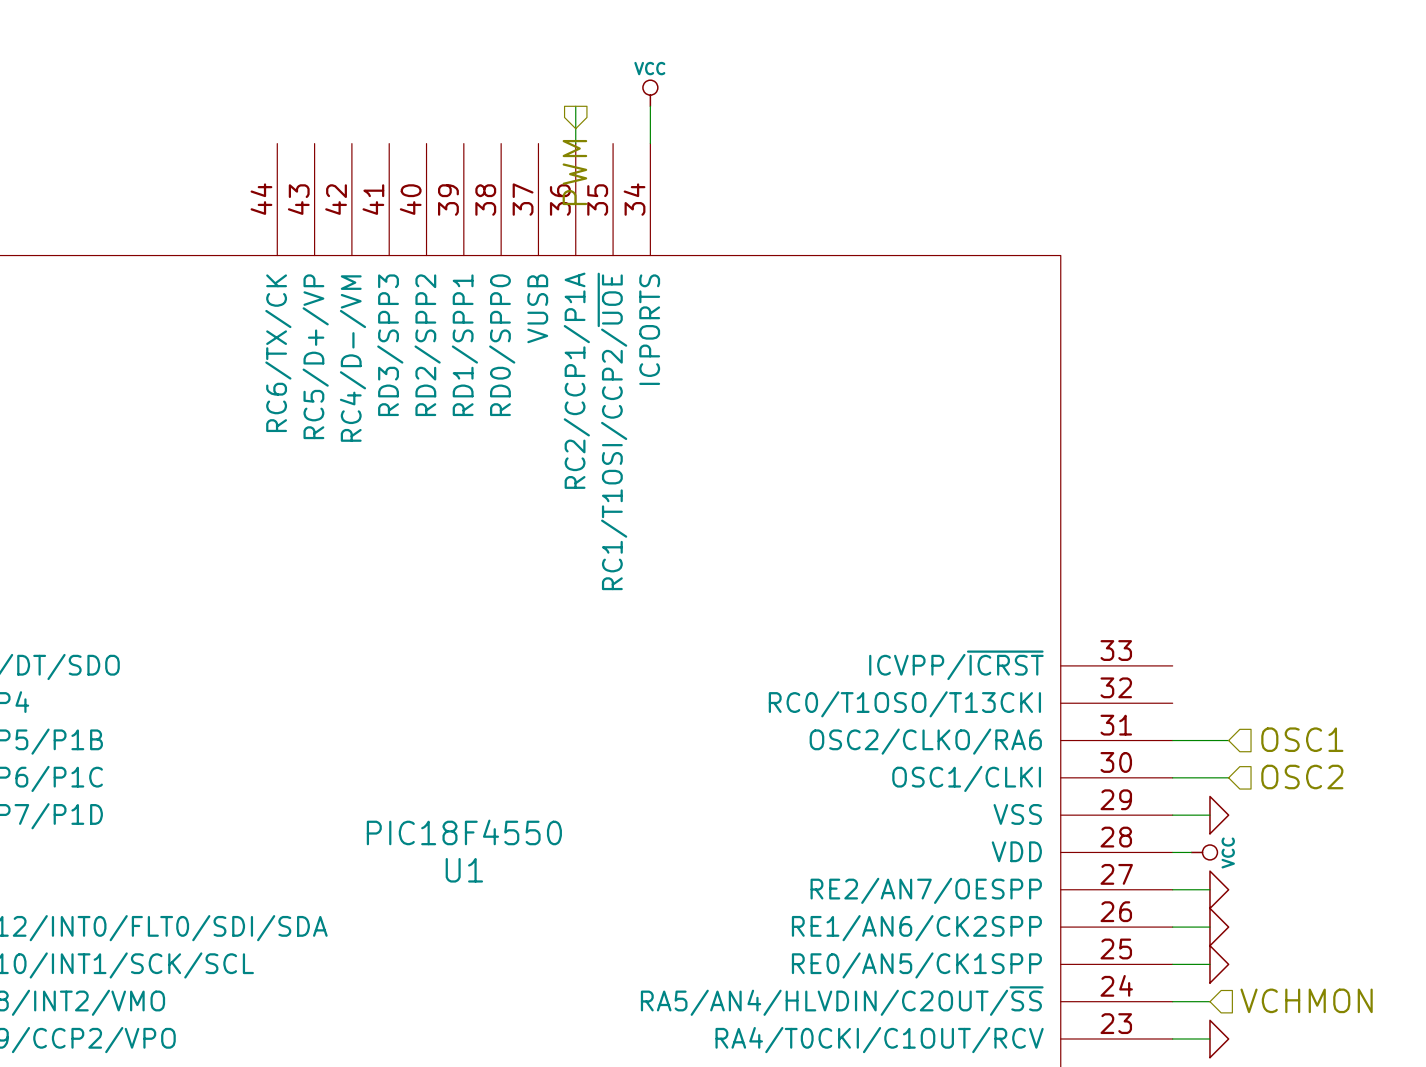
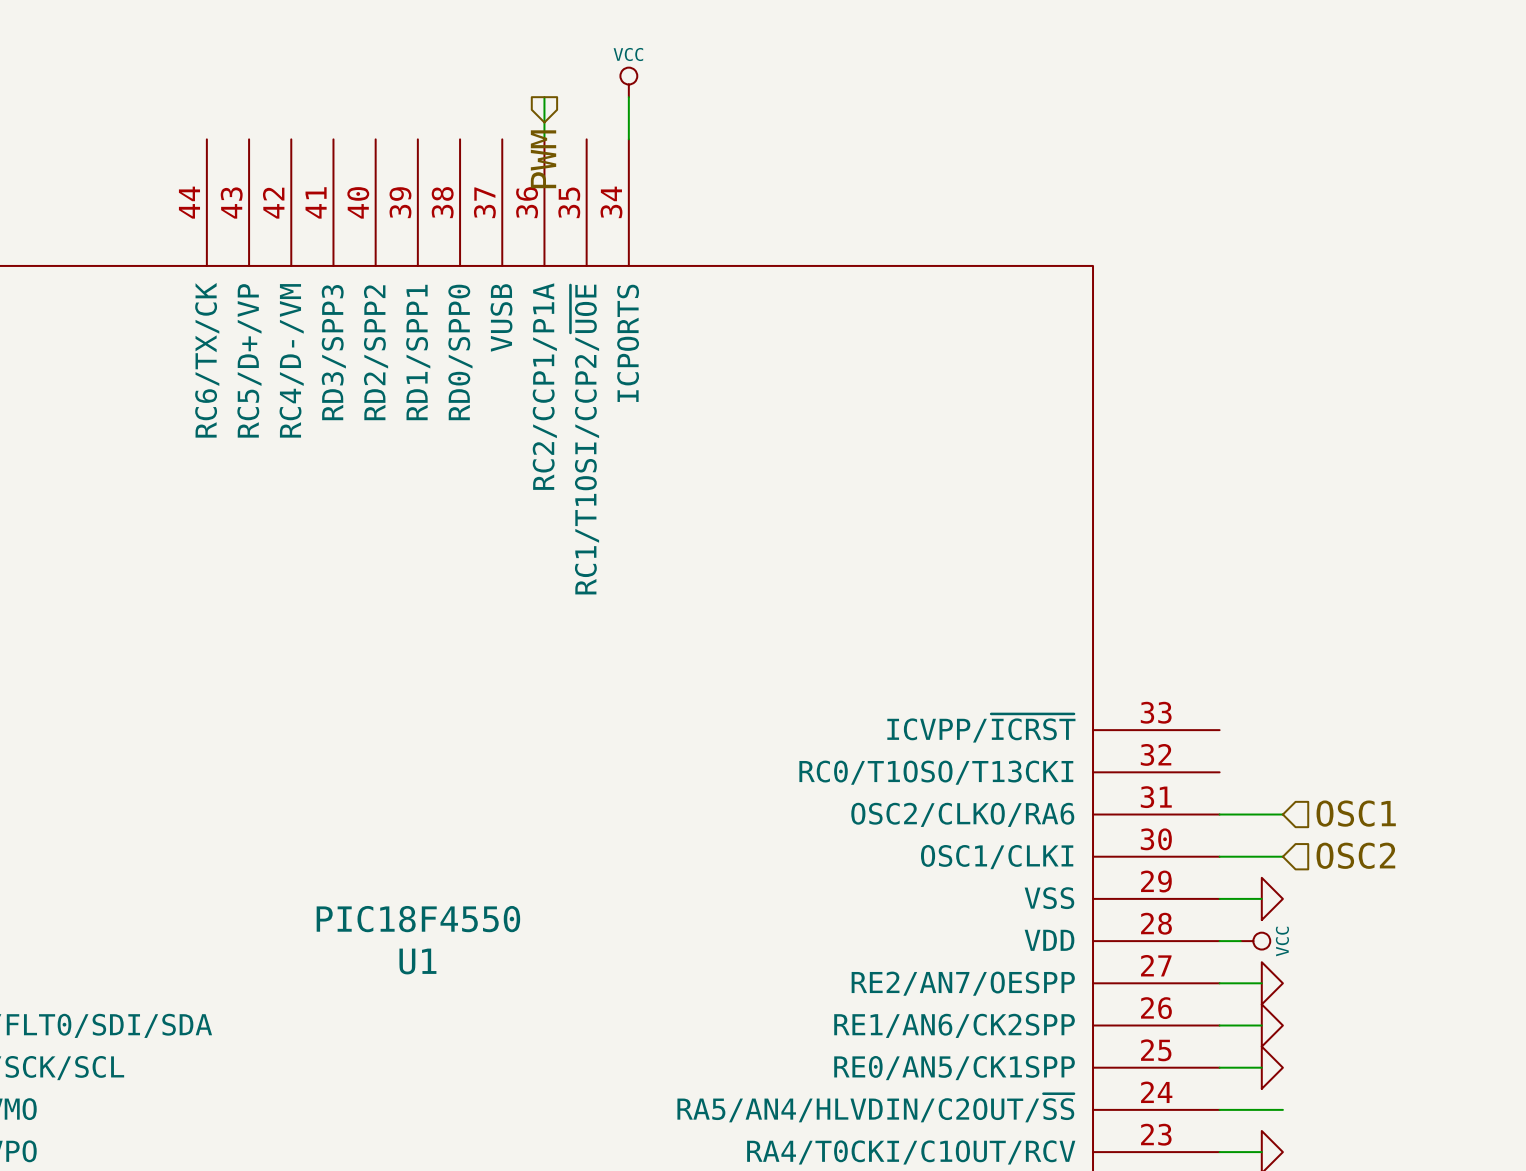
hierarchical label: VCHMON (1306, 1000) -> none
wire: none -> (1261, 1109) (1282, 1109)

